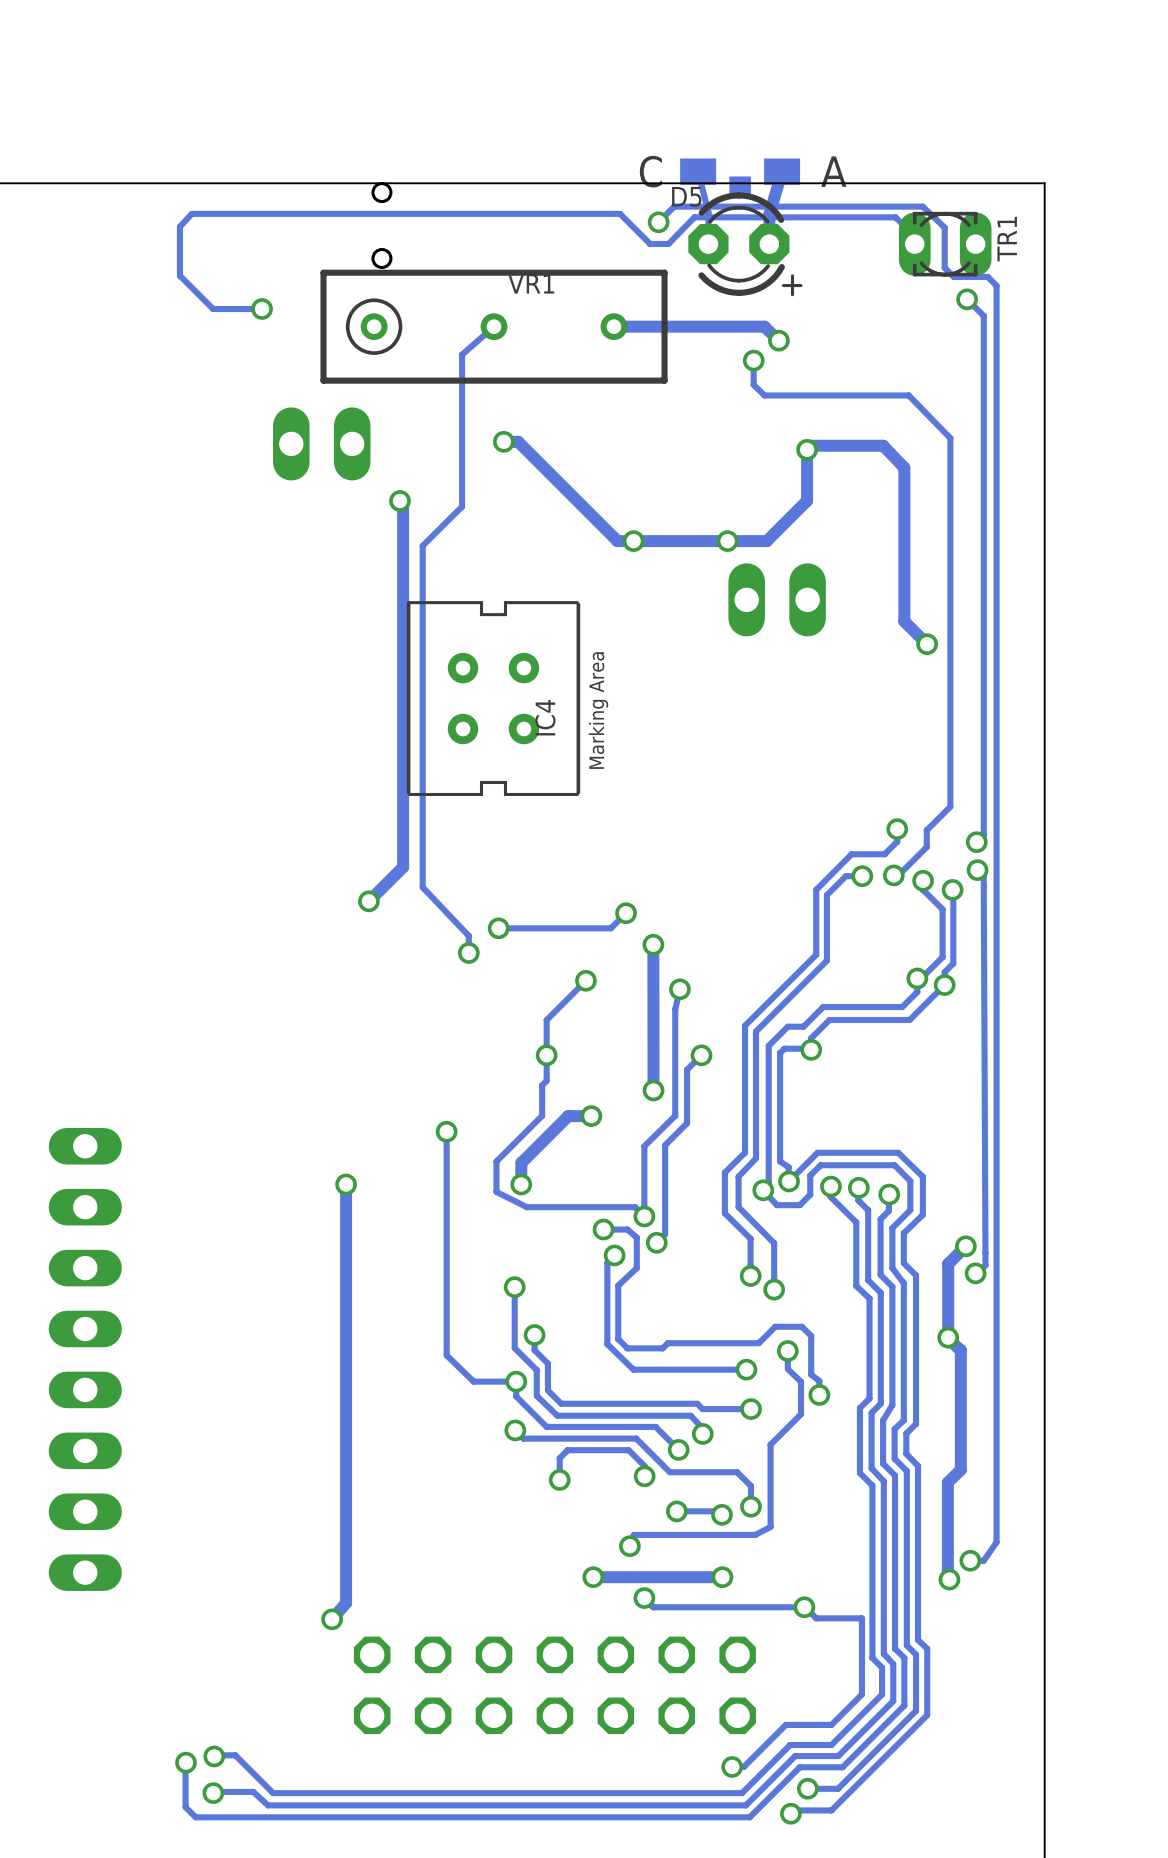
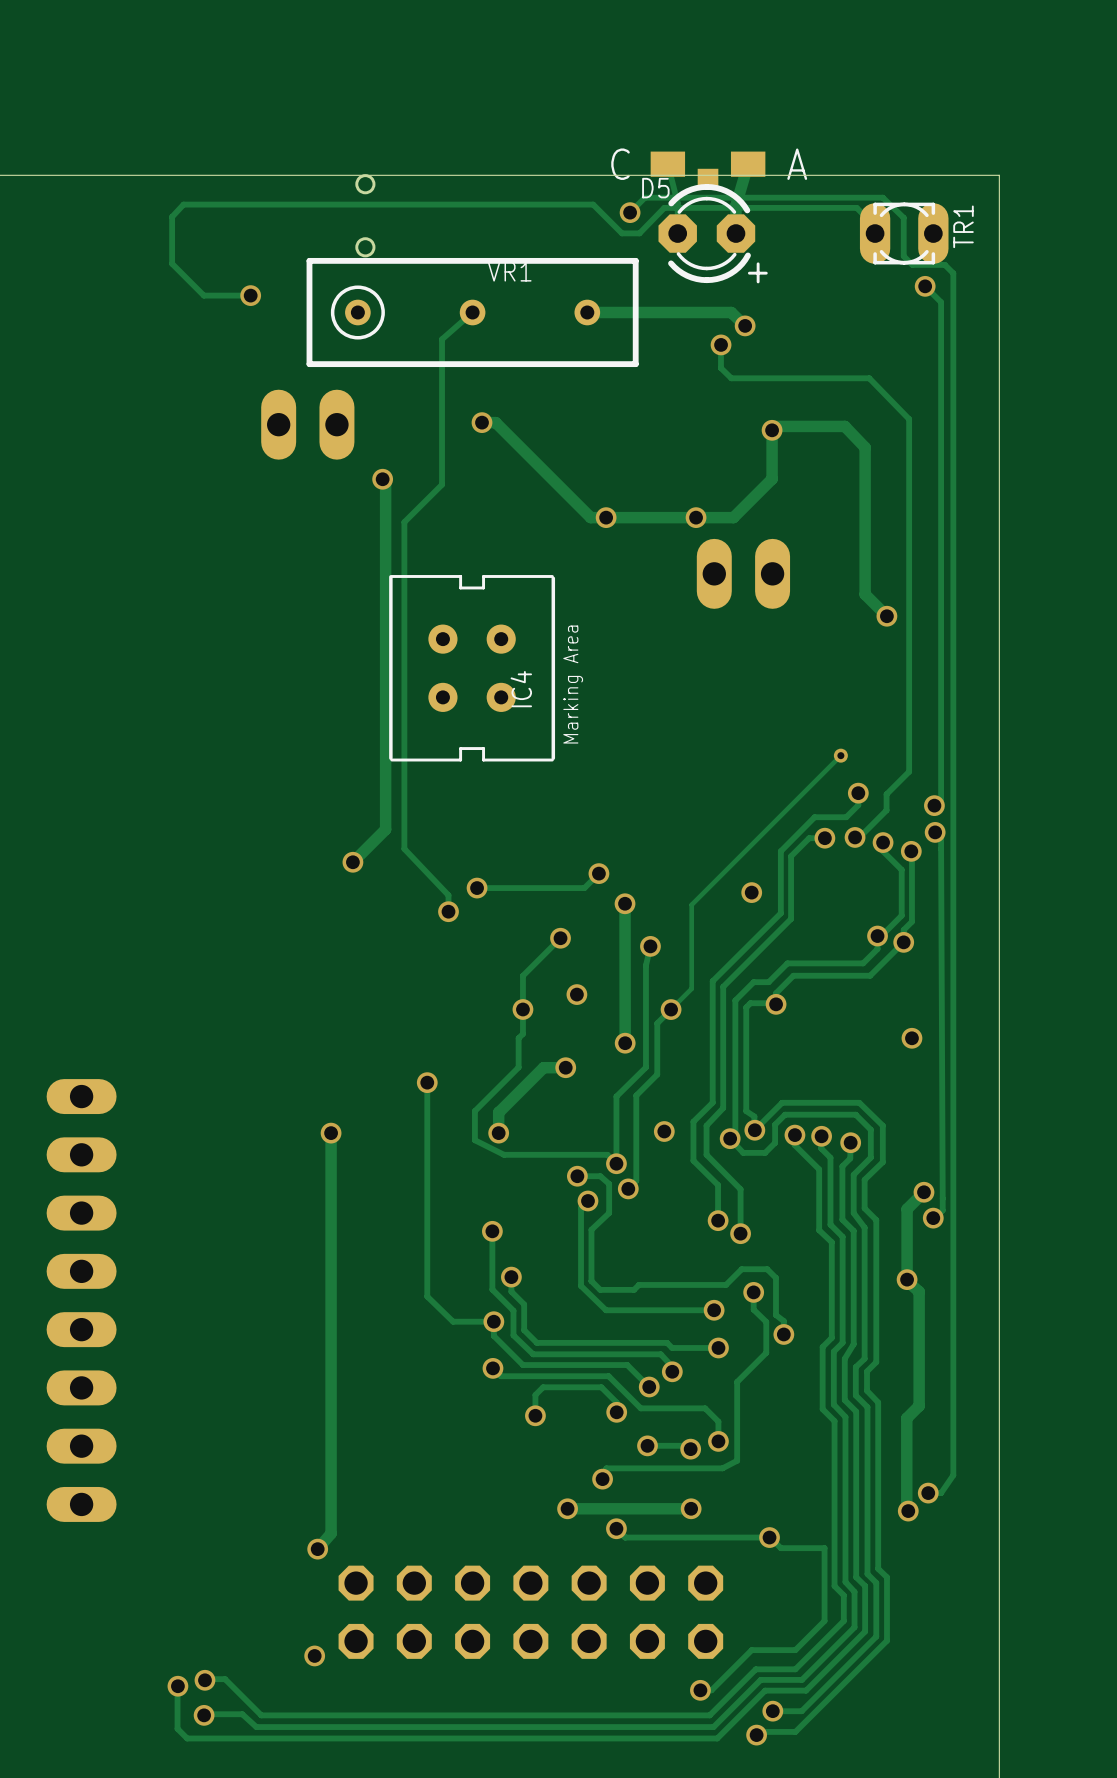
track: none -> (840, 755) (691, 904) (691, 988) (677, 1002) (673, 1002) (668, 1007) (671, 1009)
via: none -> (840, 755)
via: none -> (751, 892)
via: none -> (576, 994)
via: none -> (911, 1038)
via: none -> (664, 1131)
via: none -> (314, 1655)

